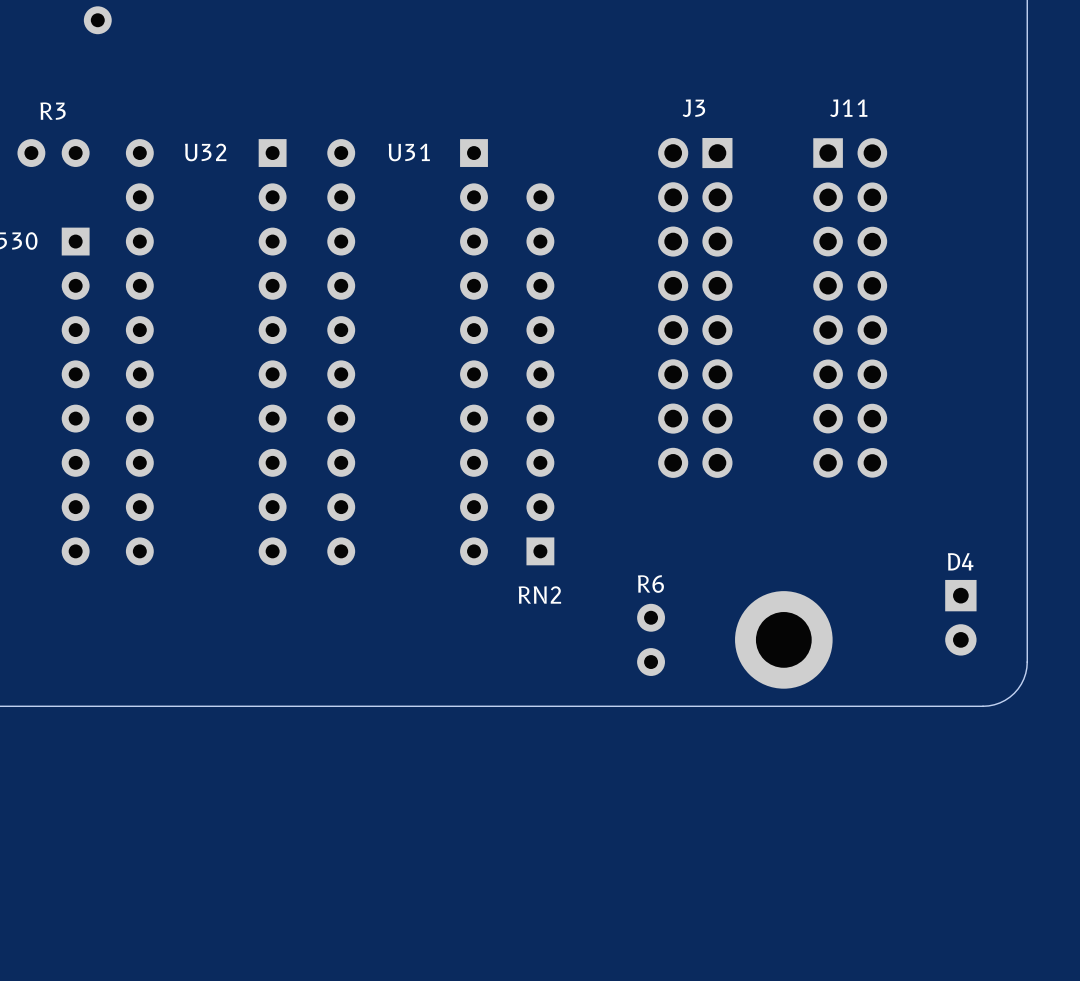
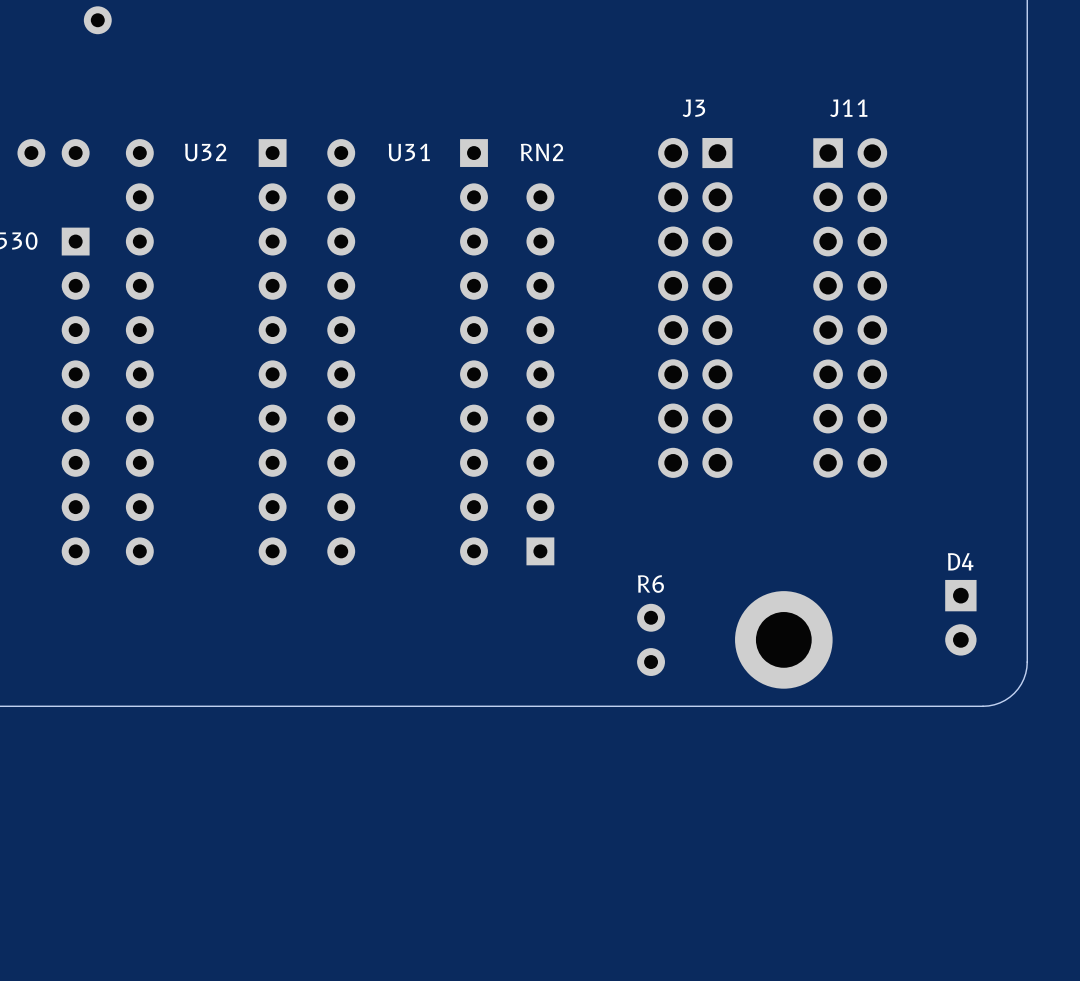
R3 name: R3 (53, 111) -> none
RN2 name position: RN2 (539, 594) -> RN2 (542, 152)

